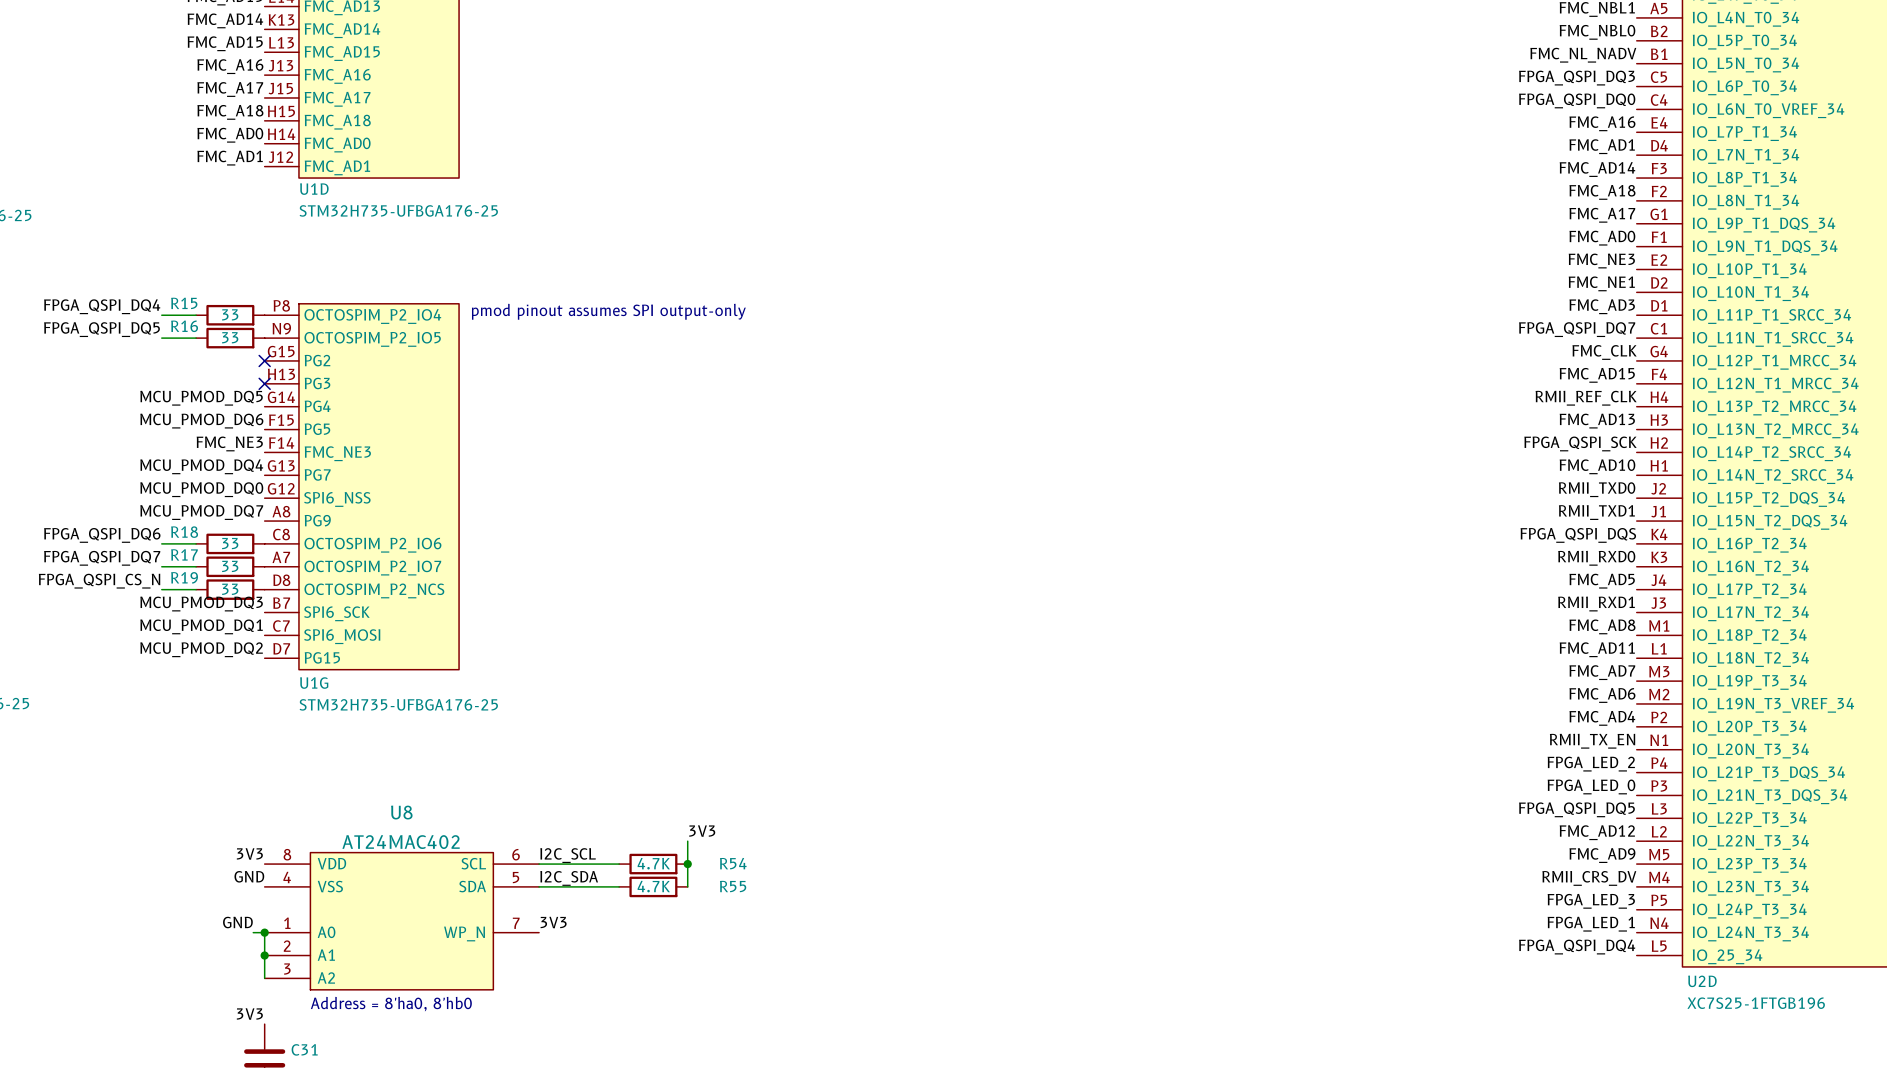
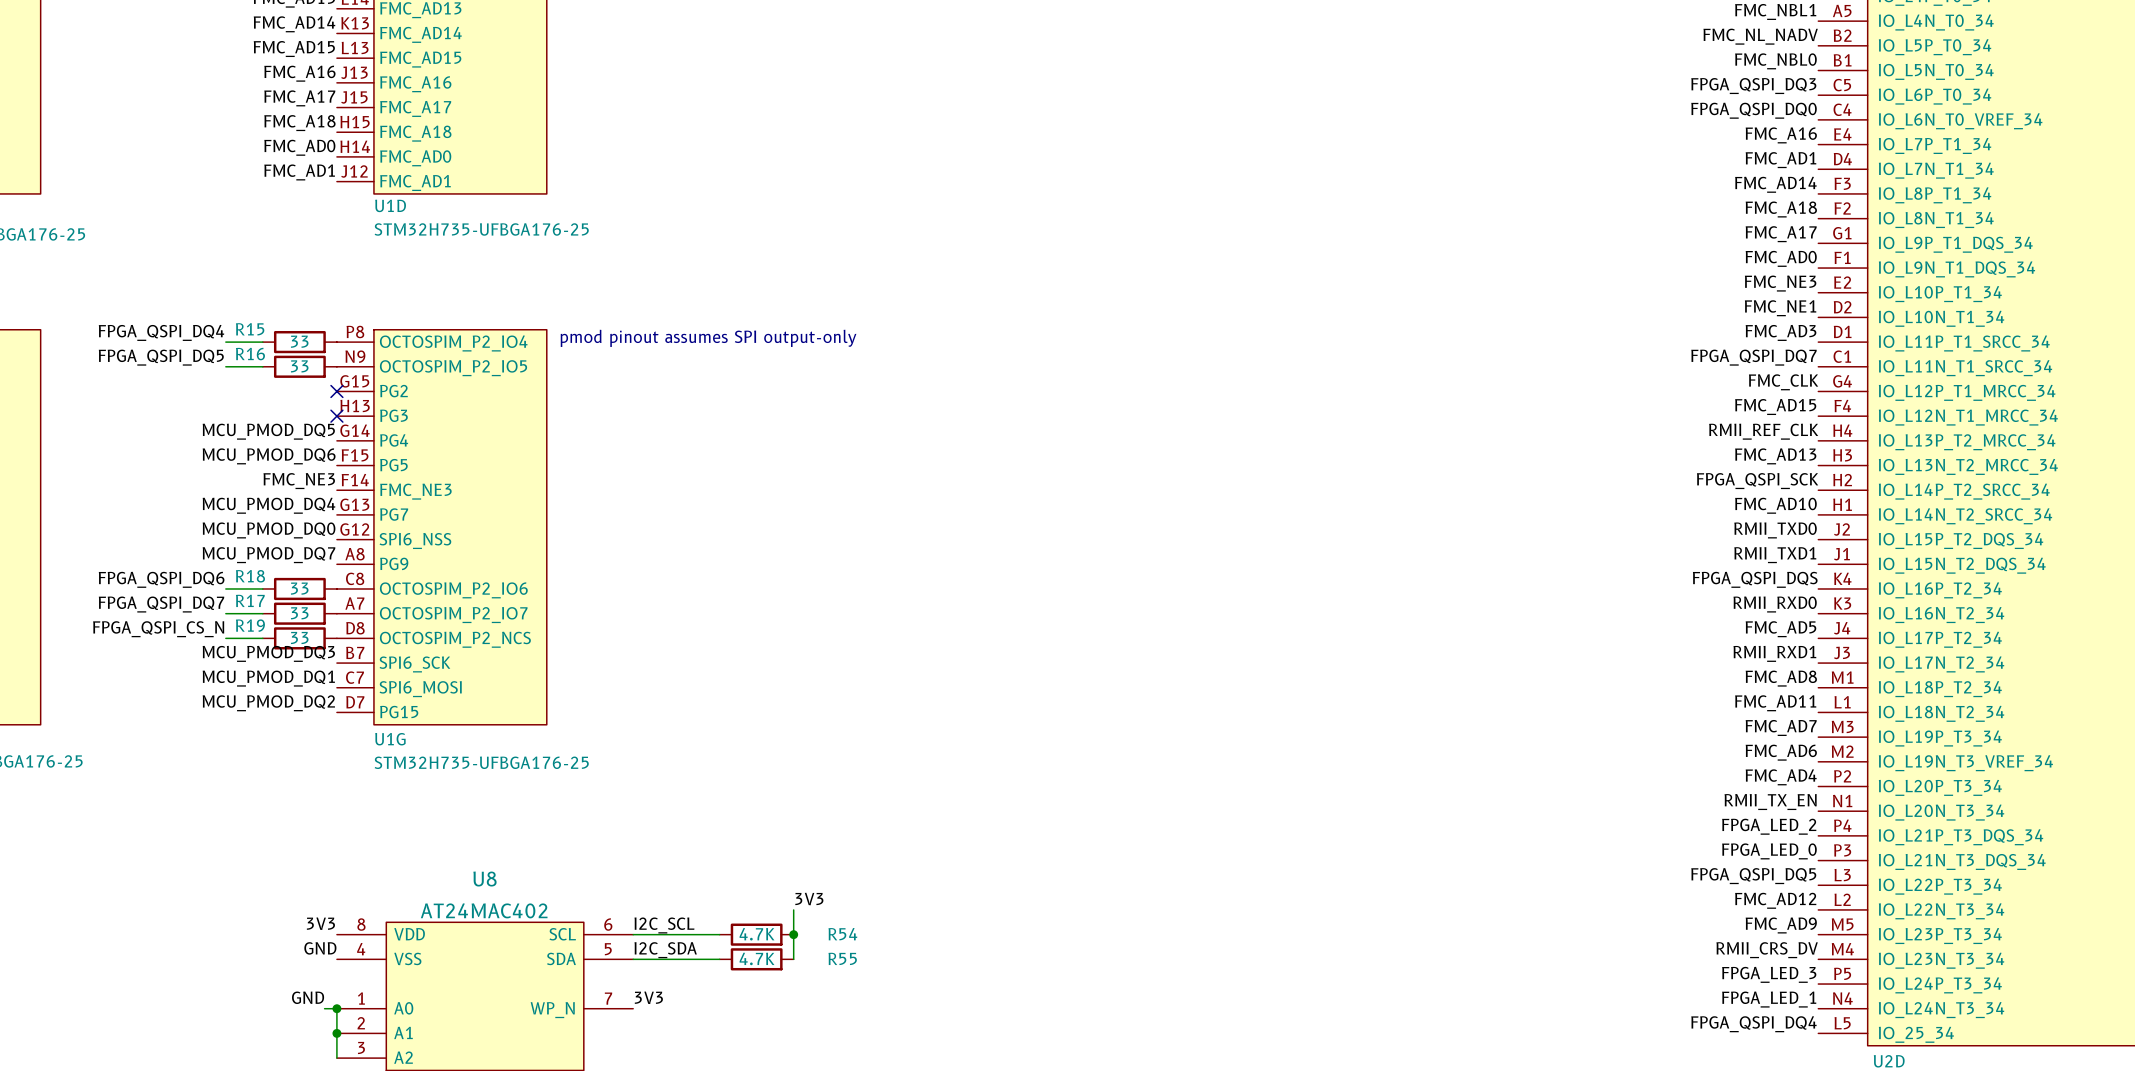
label: FMC_NBL0 (1597, 32) -> FMC_NL_NADV (1760, 36)
label: FMC_NL_NADV (1583, 55) -> FMC_NBL0 (1775, 61)

